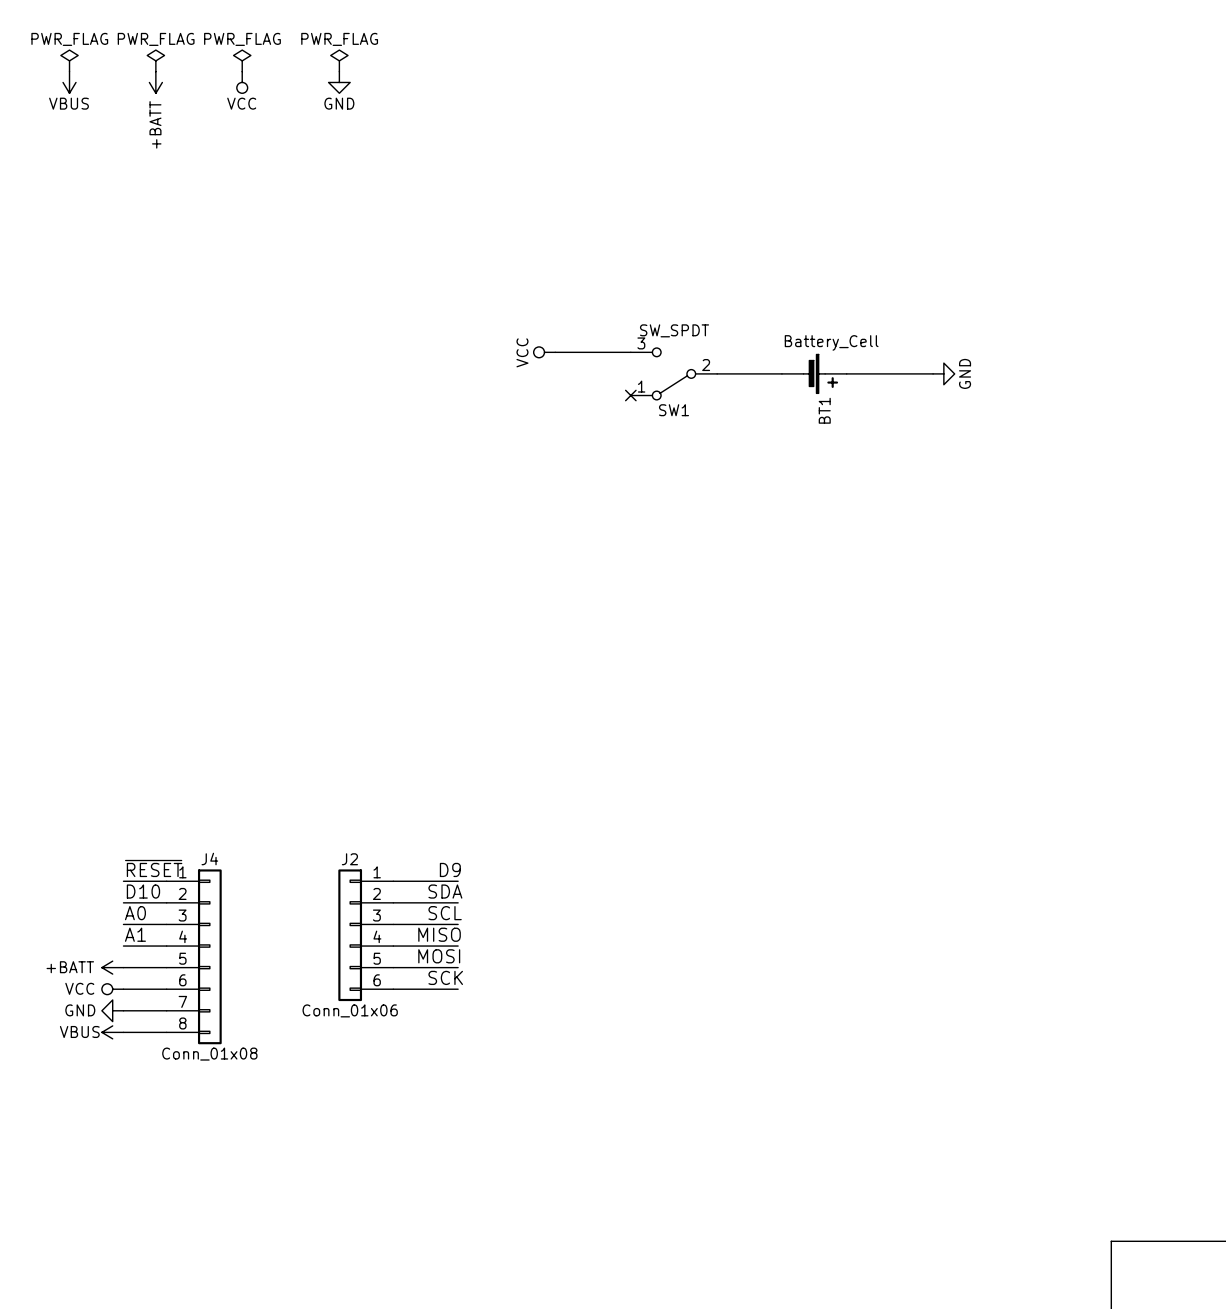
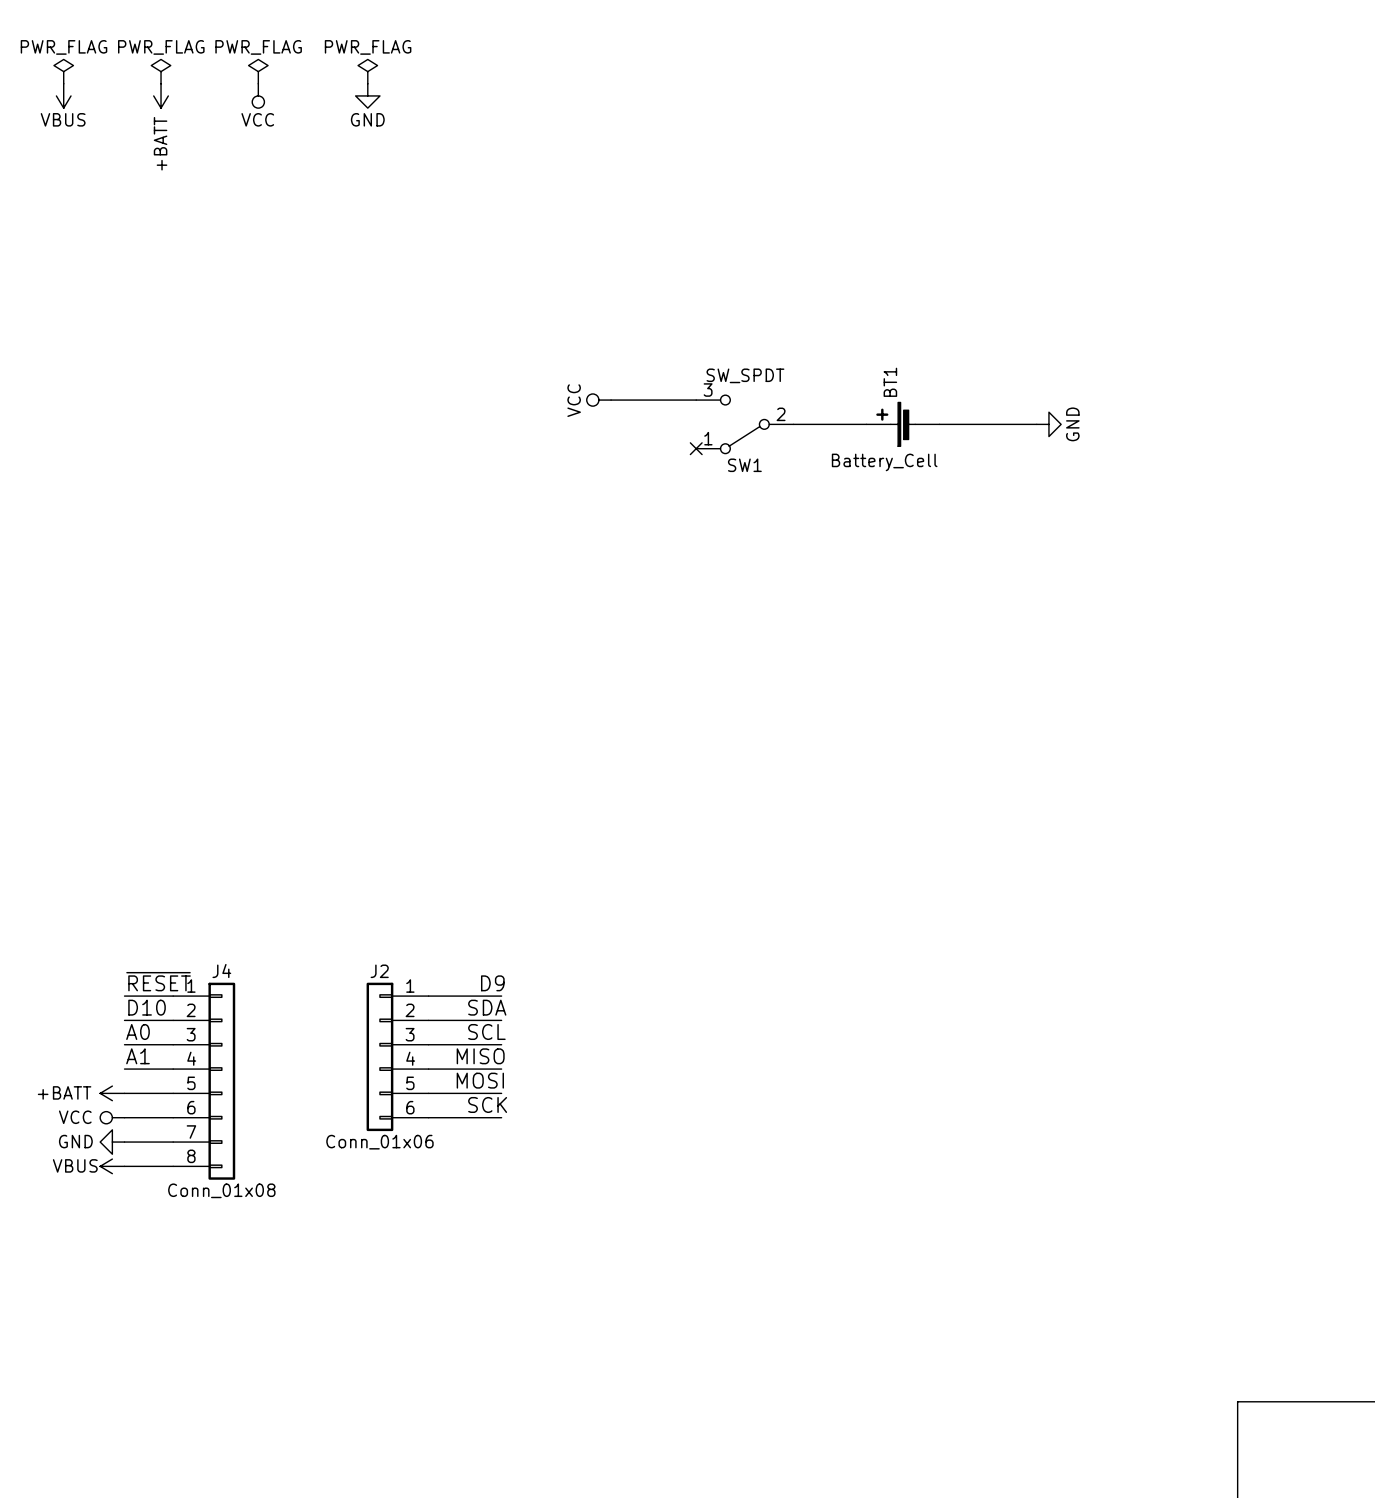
BT1 rotation: 0° (820, 373) -> 180° (895, 424)

